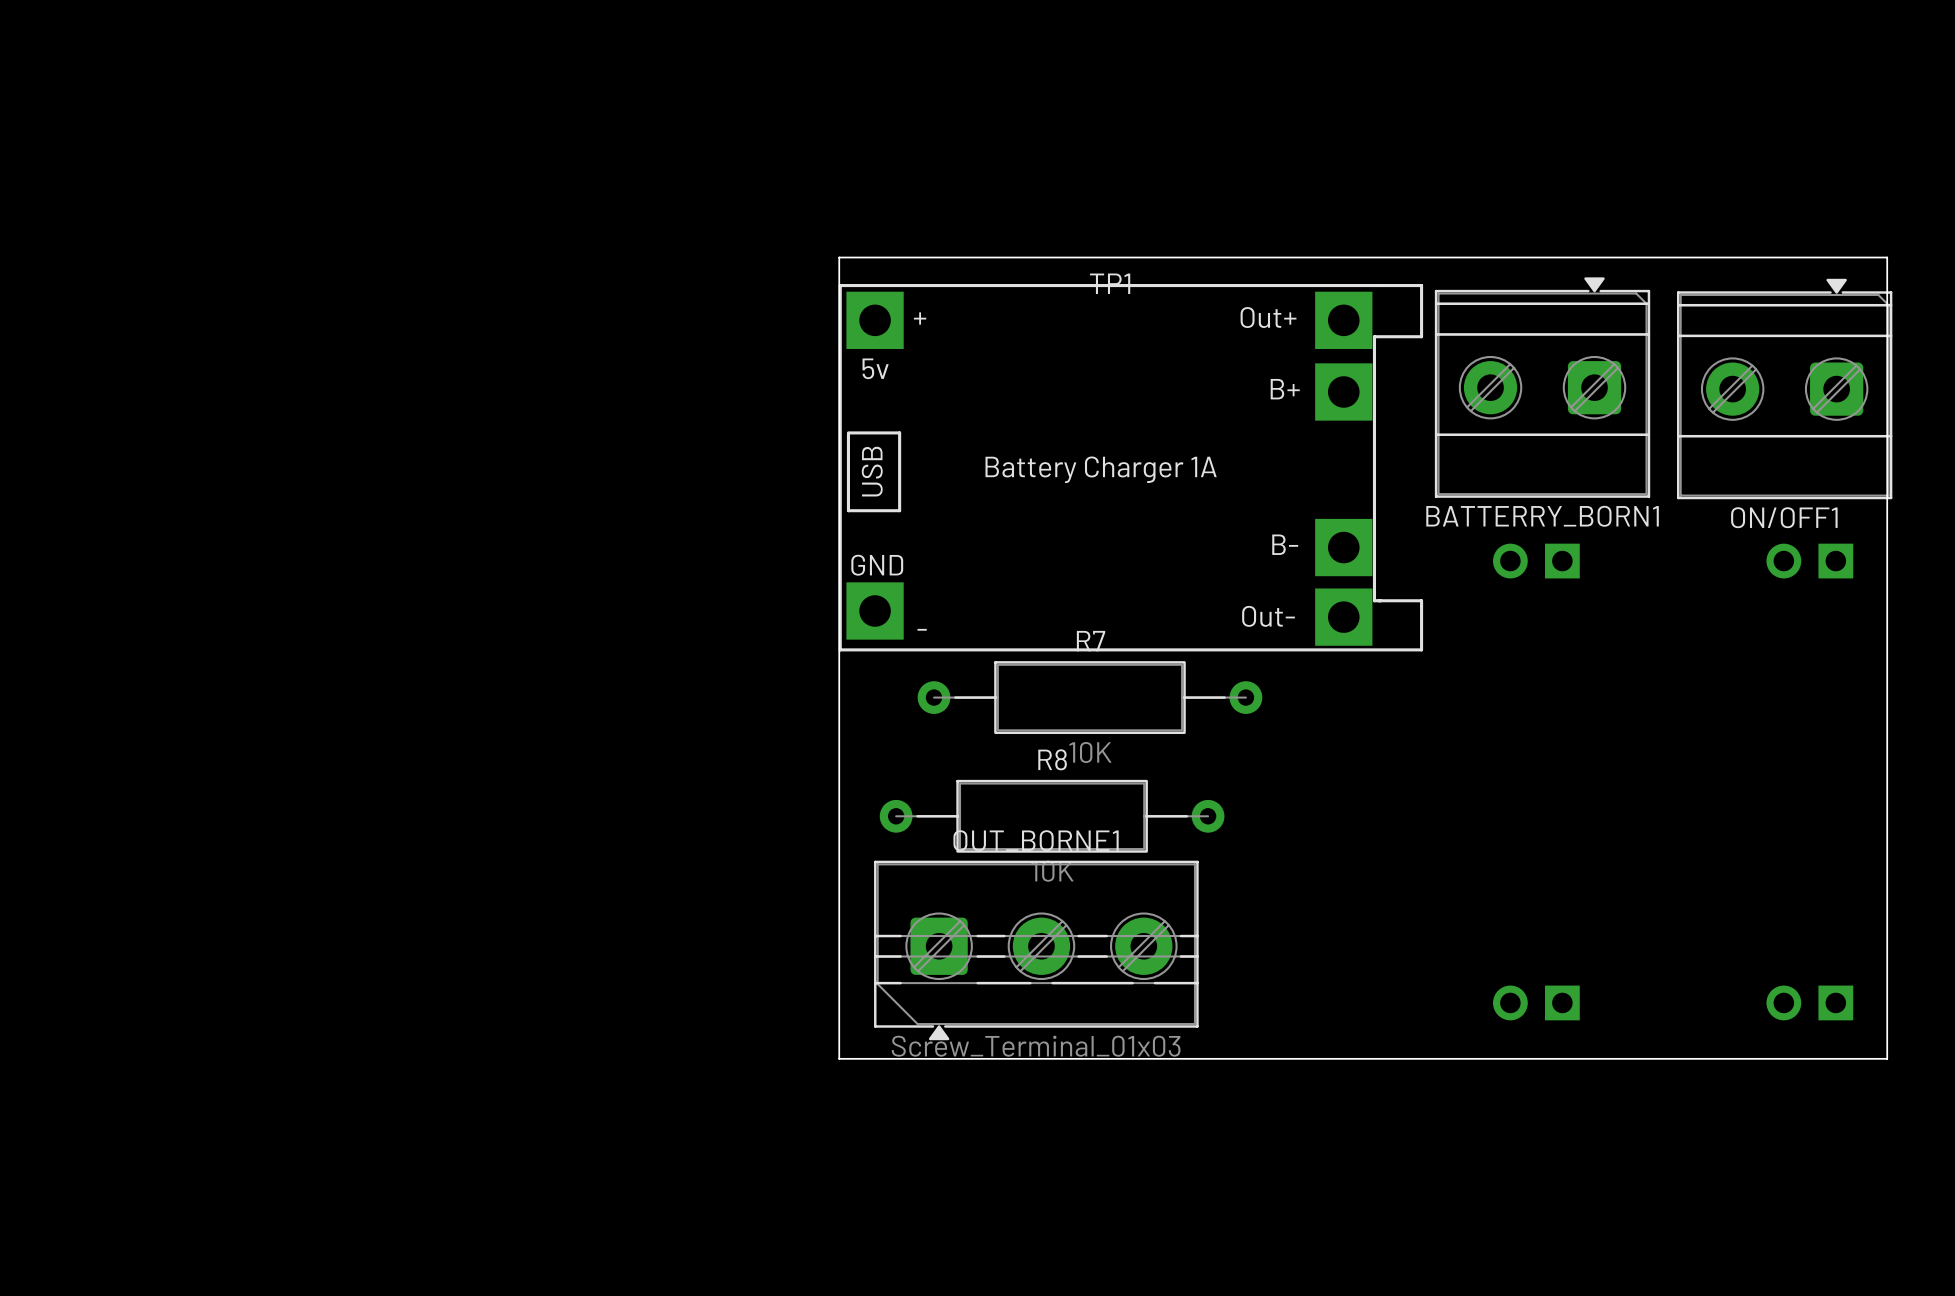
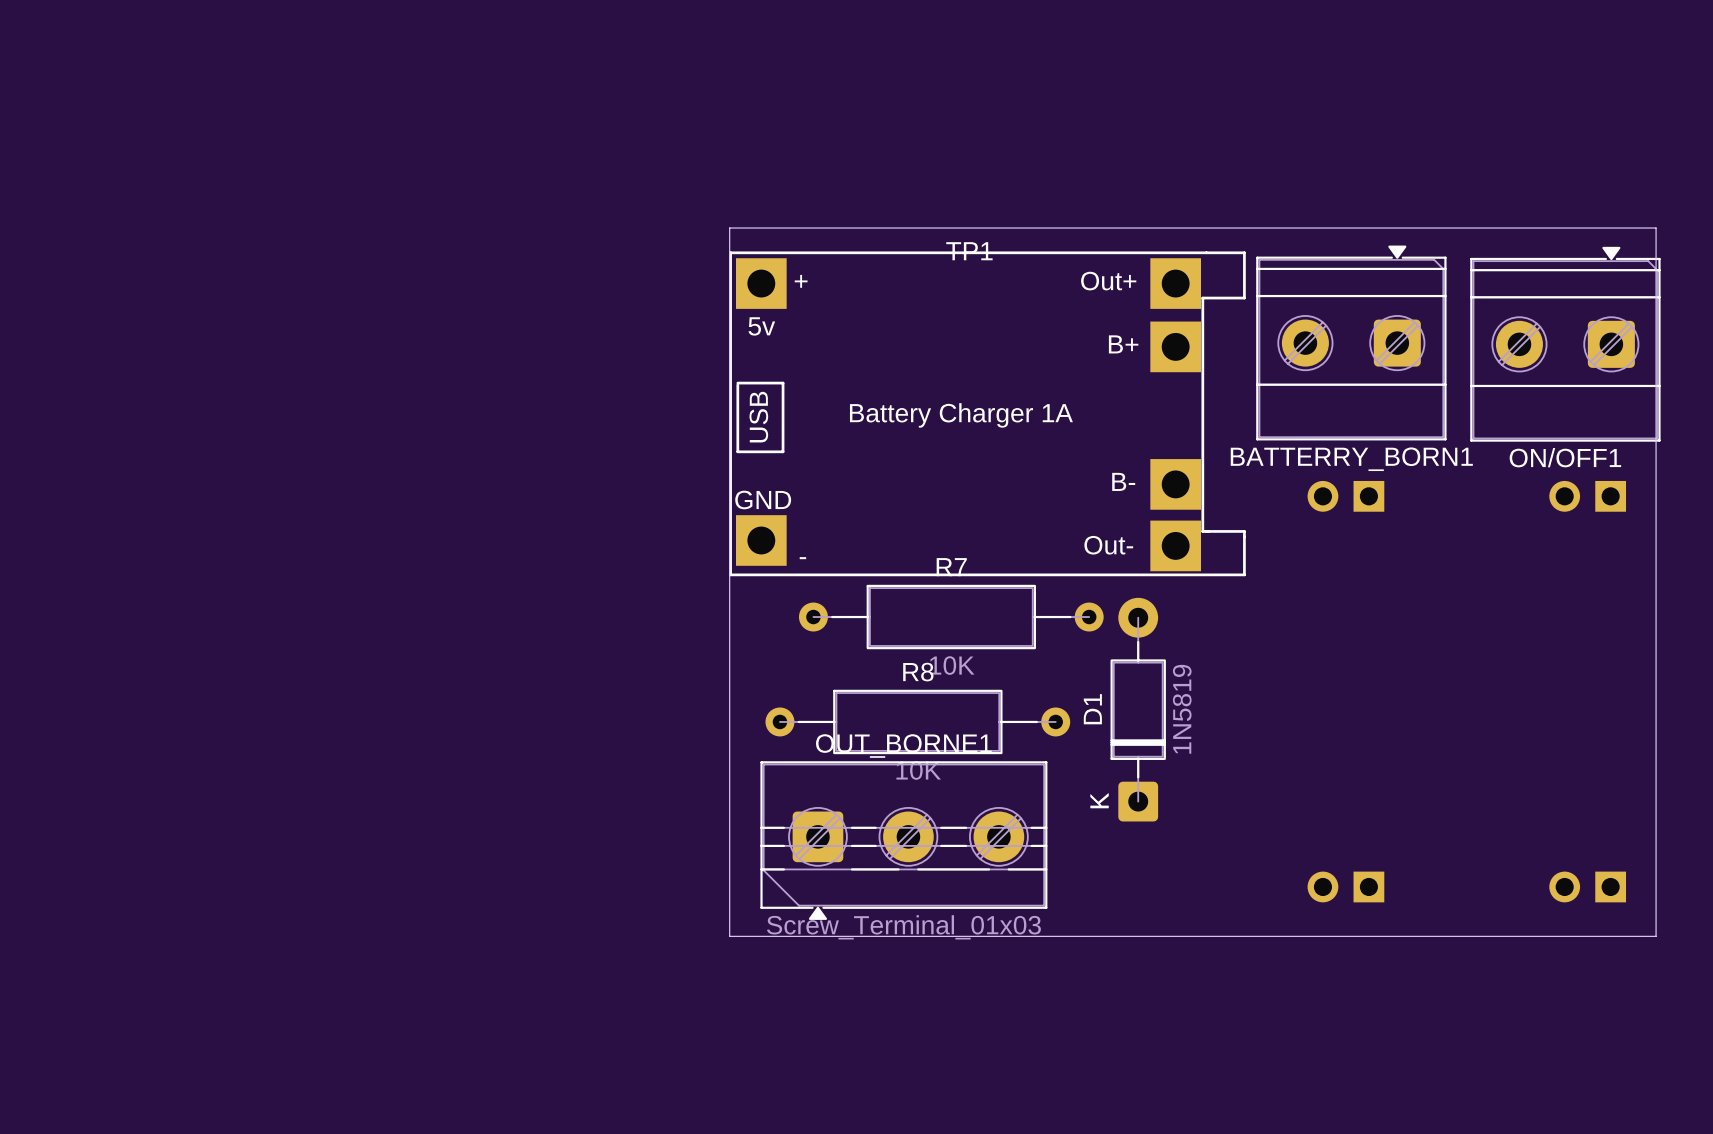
D1: none -> 1N5819 (1138, 709)

